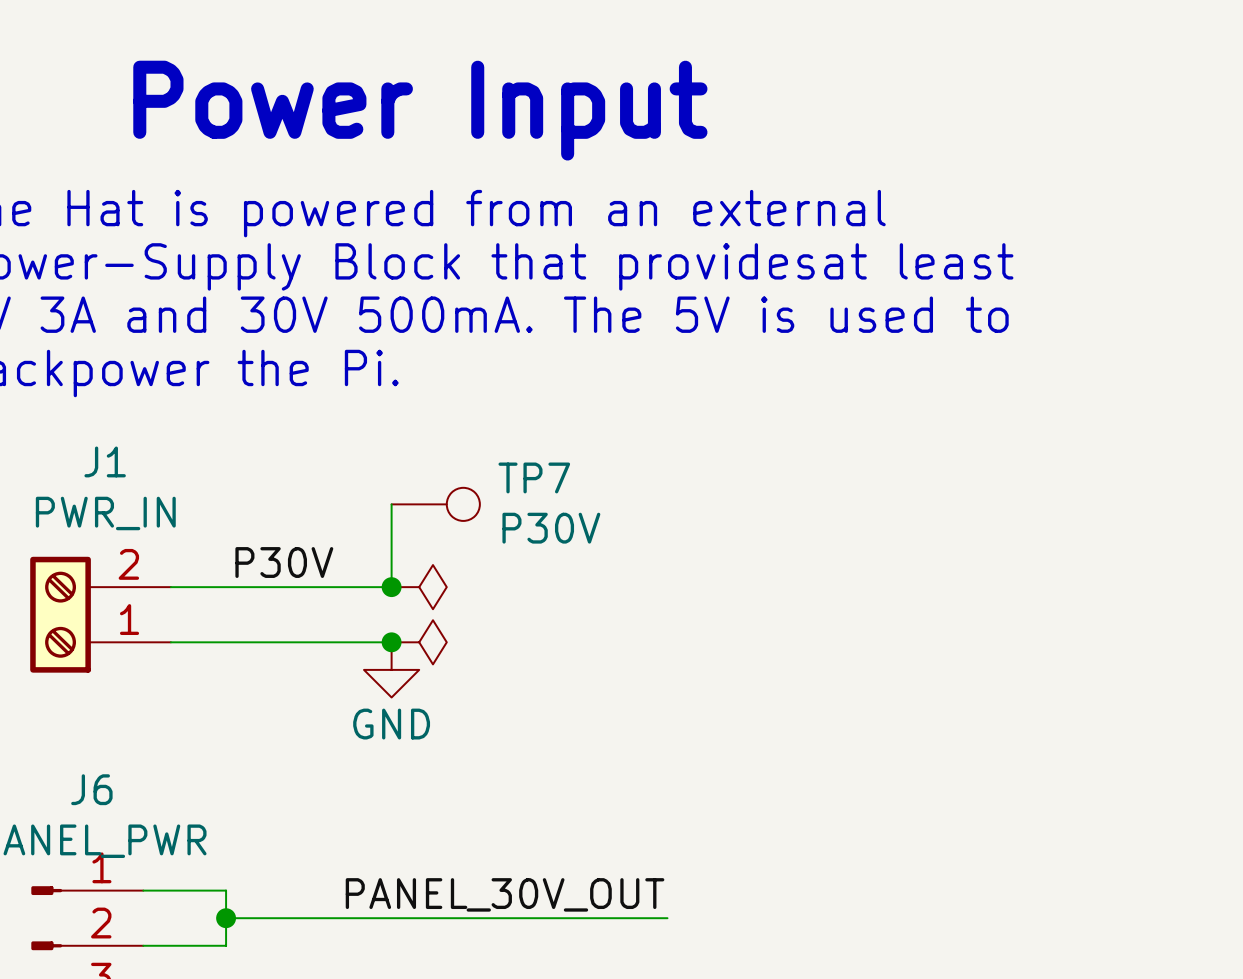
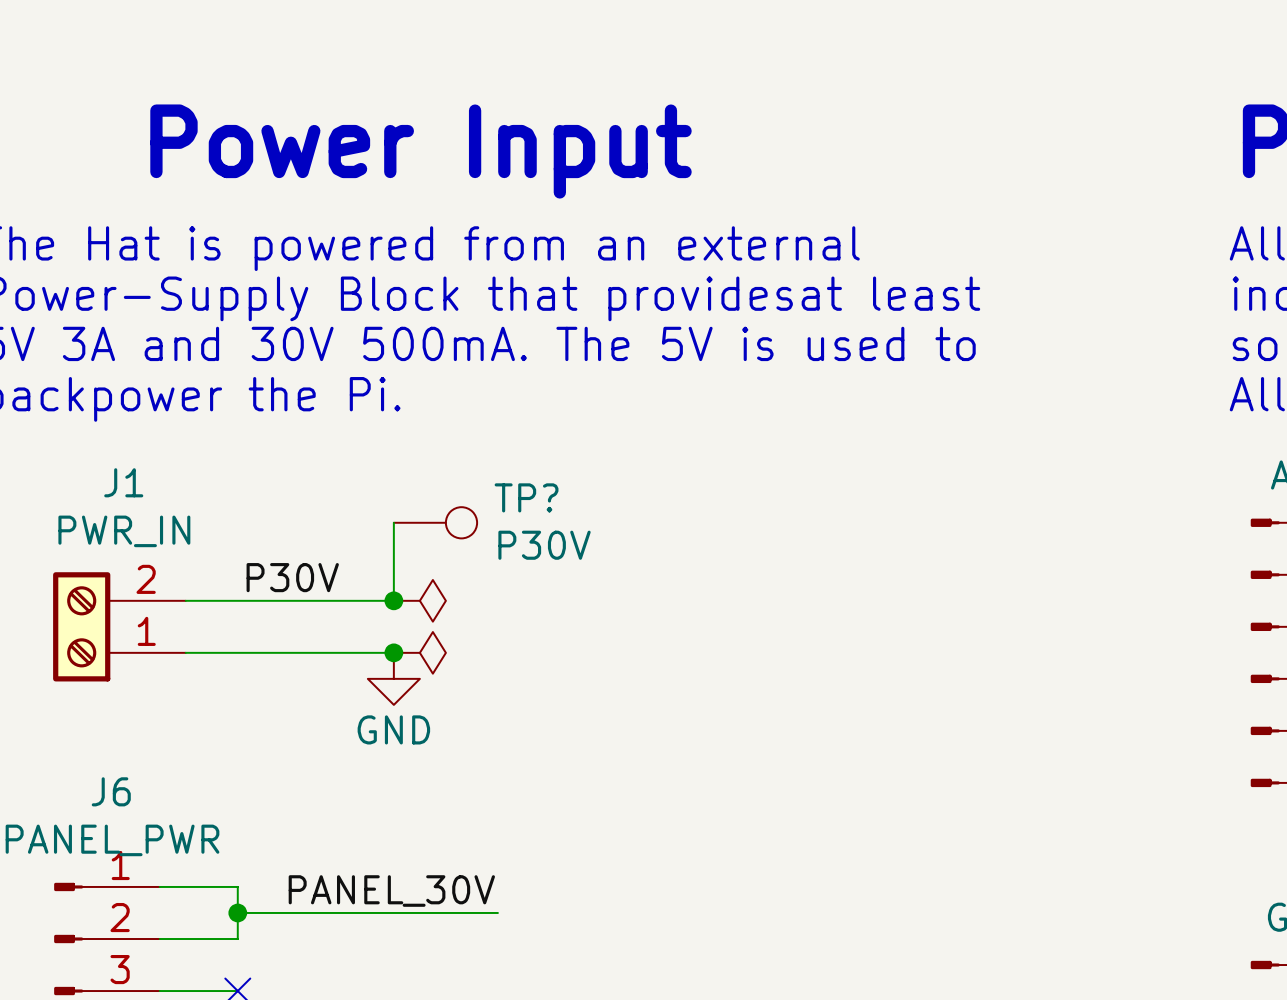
TP7 name: TP7 (534, 477) -> TP? (526, 497)
label: PANEL_30V_OUT (505, 894) -> PANEL_30V (391, 891)
wire: (501, 918) (667, 918) -> none

